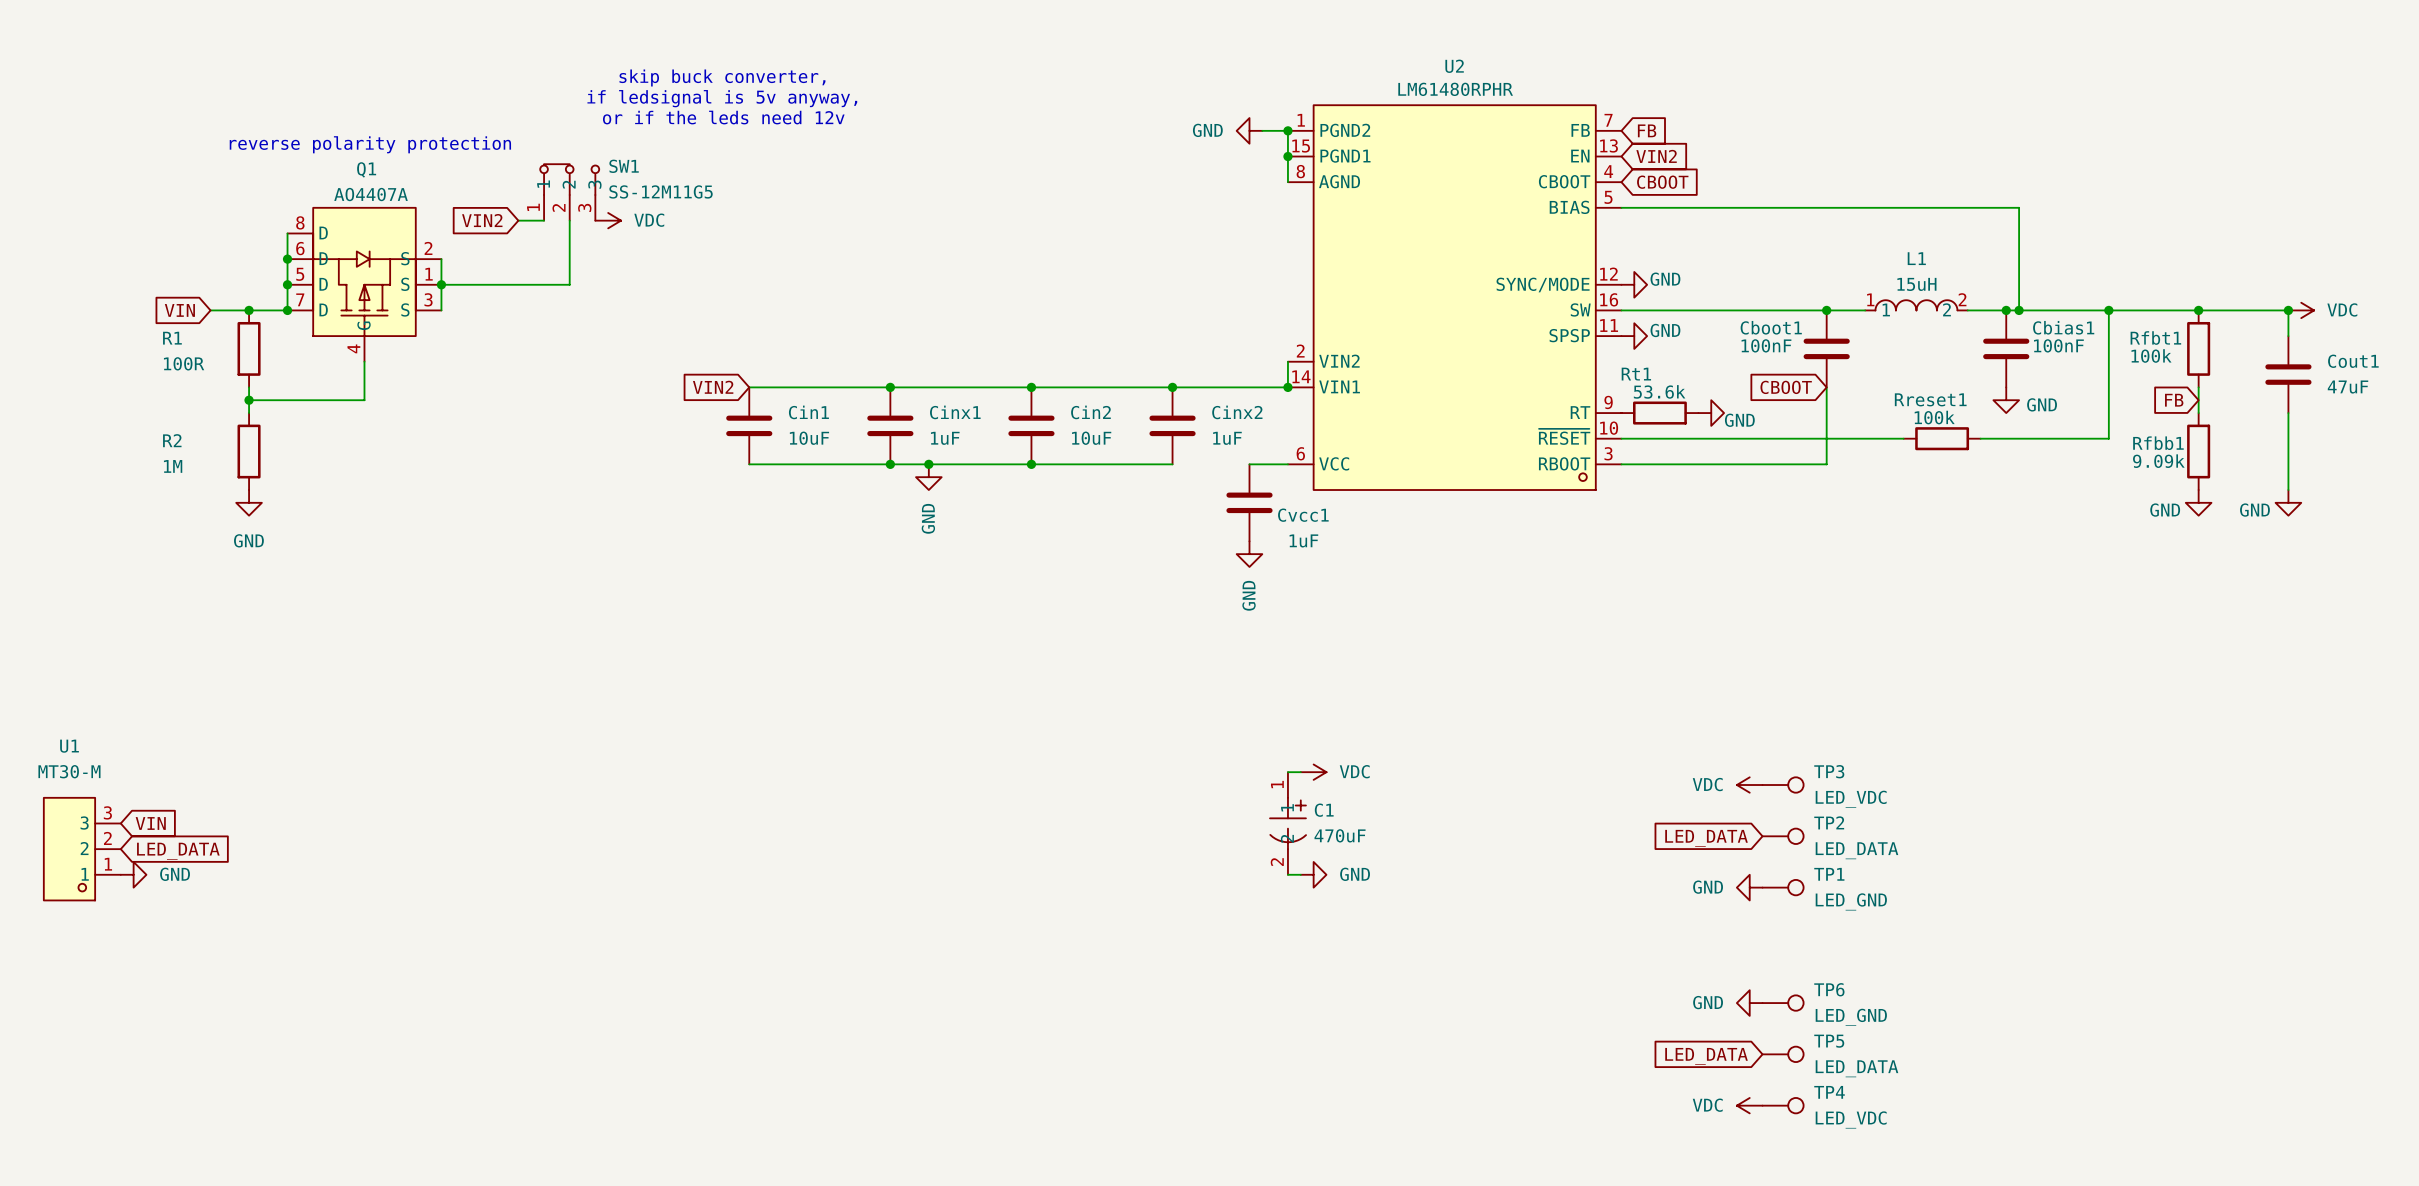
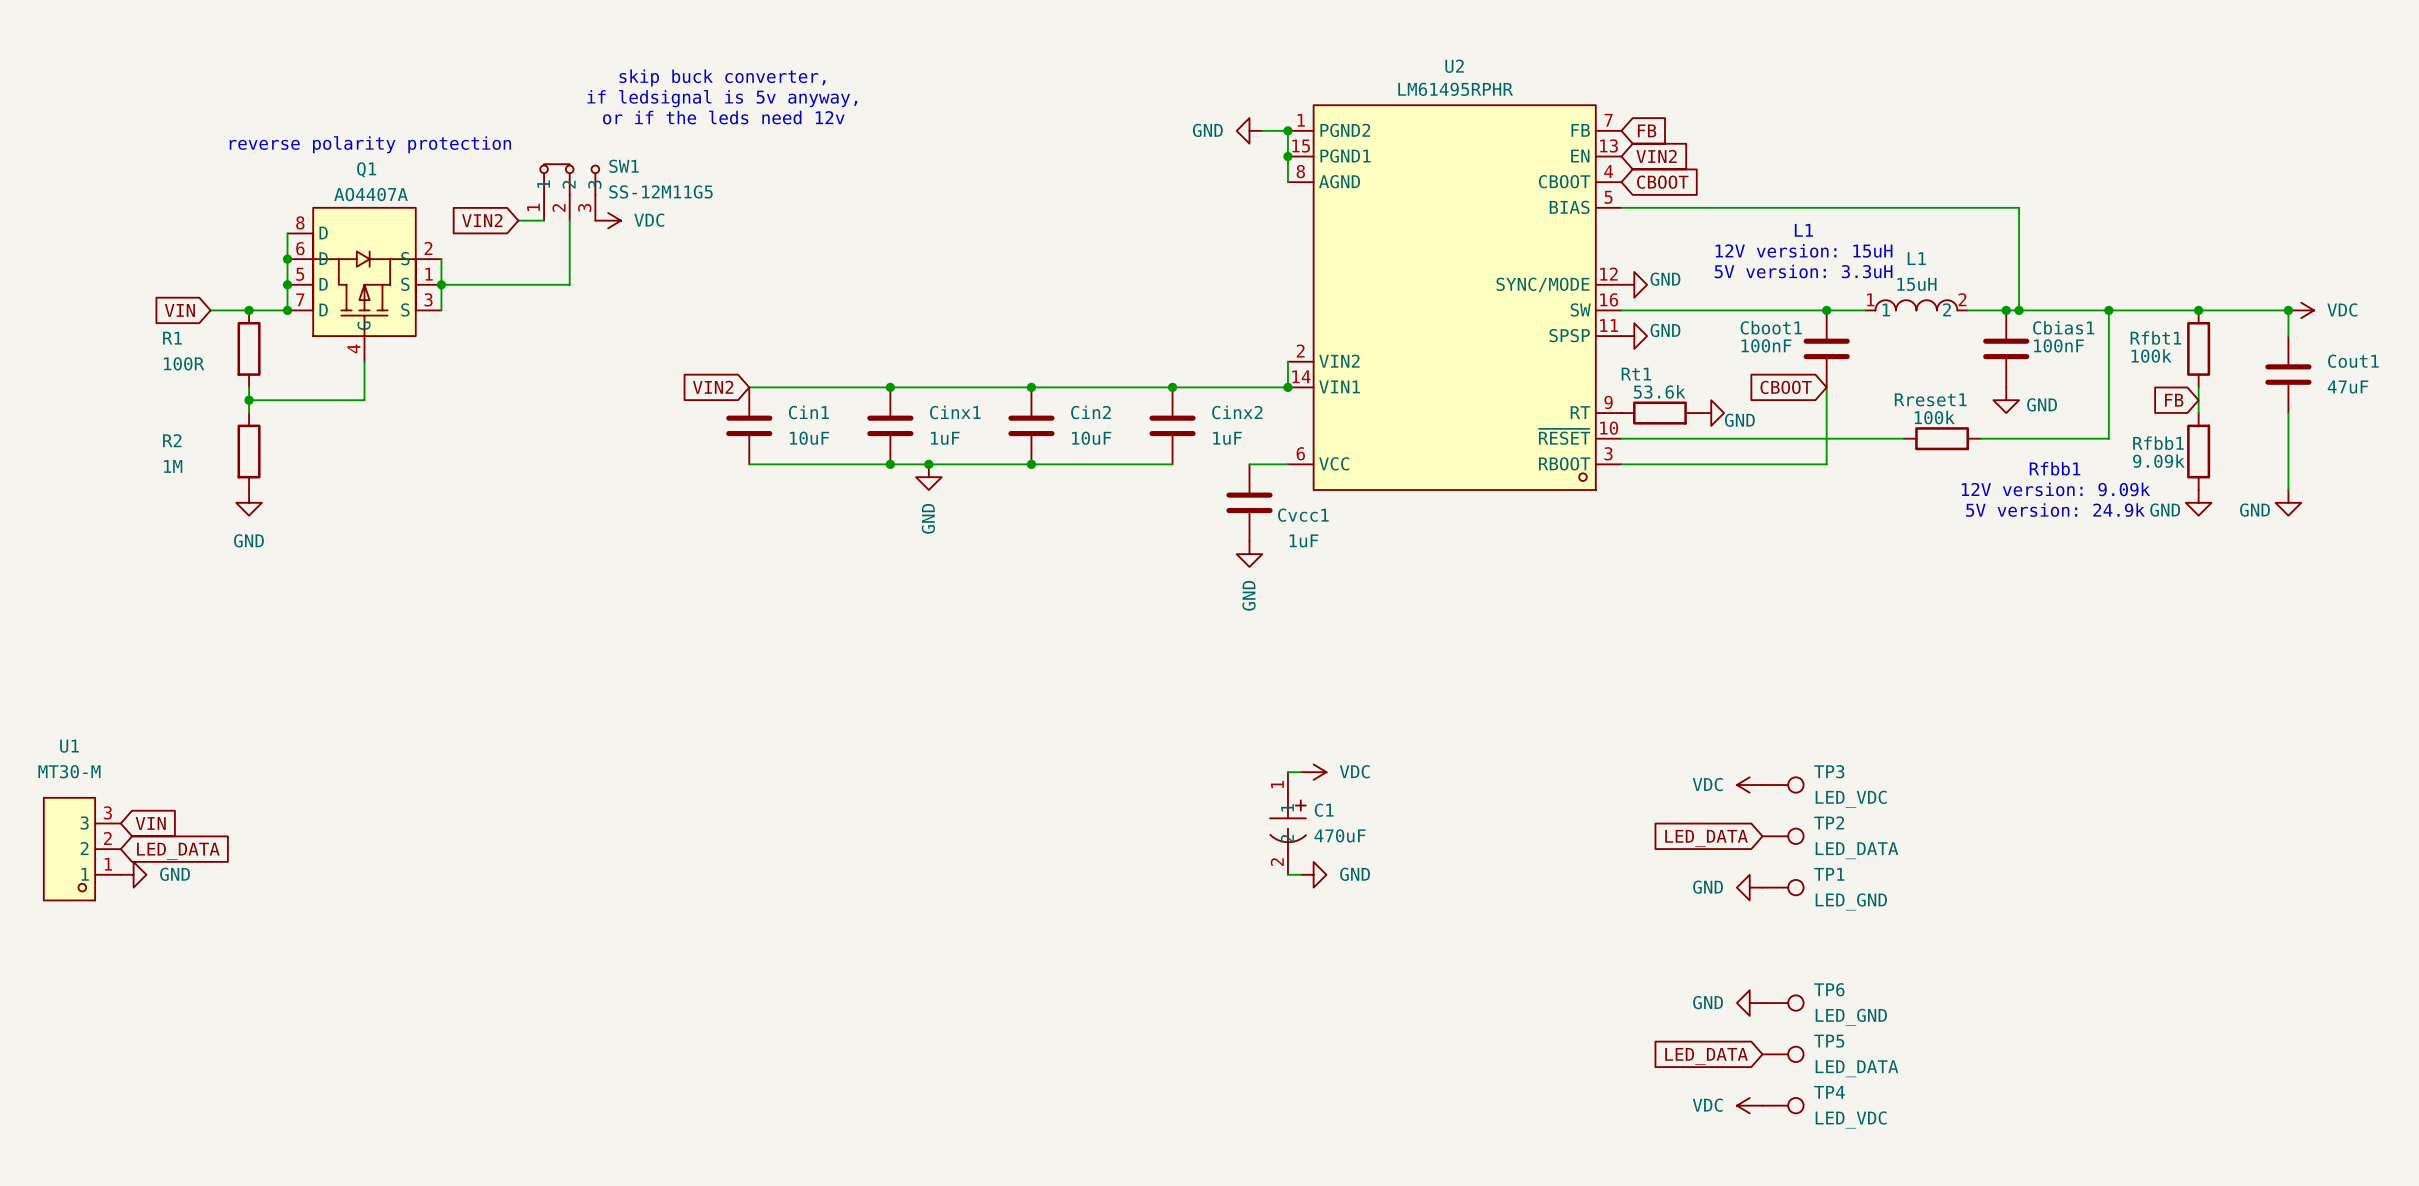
U2 value: LM61480RPHR (1455, 89) -> LM61495RPHR (1455, 89)
text: none -> L1 (1803, 230)
text: none -> 12V version: 15uH (1804, 250)
text: none -> 5V version: 3.3uH (1803, 271)
text: none -> Rfbb1 (2055, 468)
text: none -> 12V version: 9.09k (2055, 489)
text: none -> 5V version: 24.9k (2055, 510)

